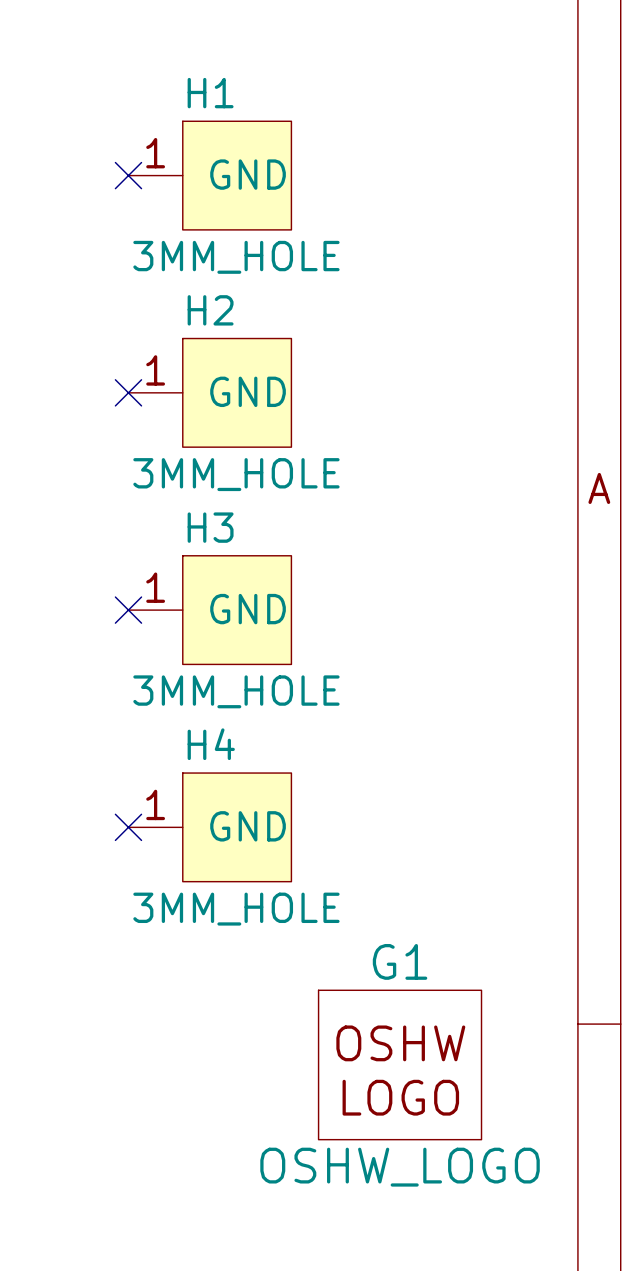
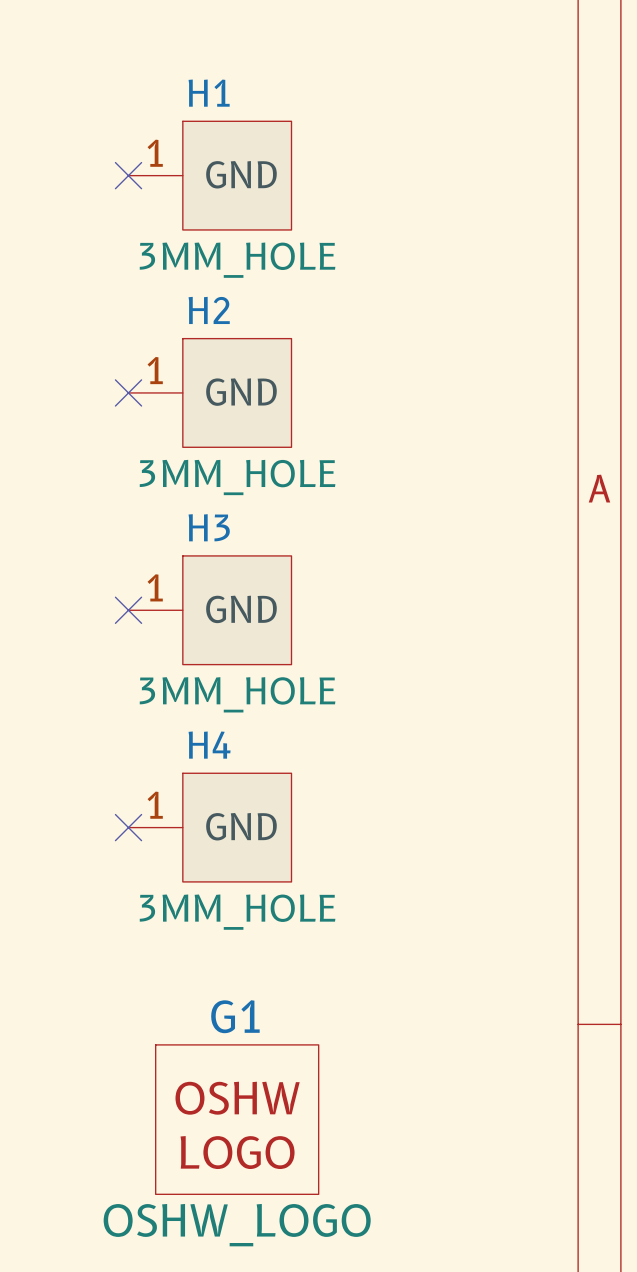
G1 position: (400, 1064) -> (237, 1119)

